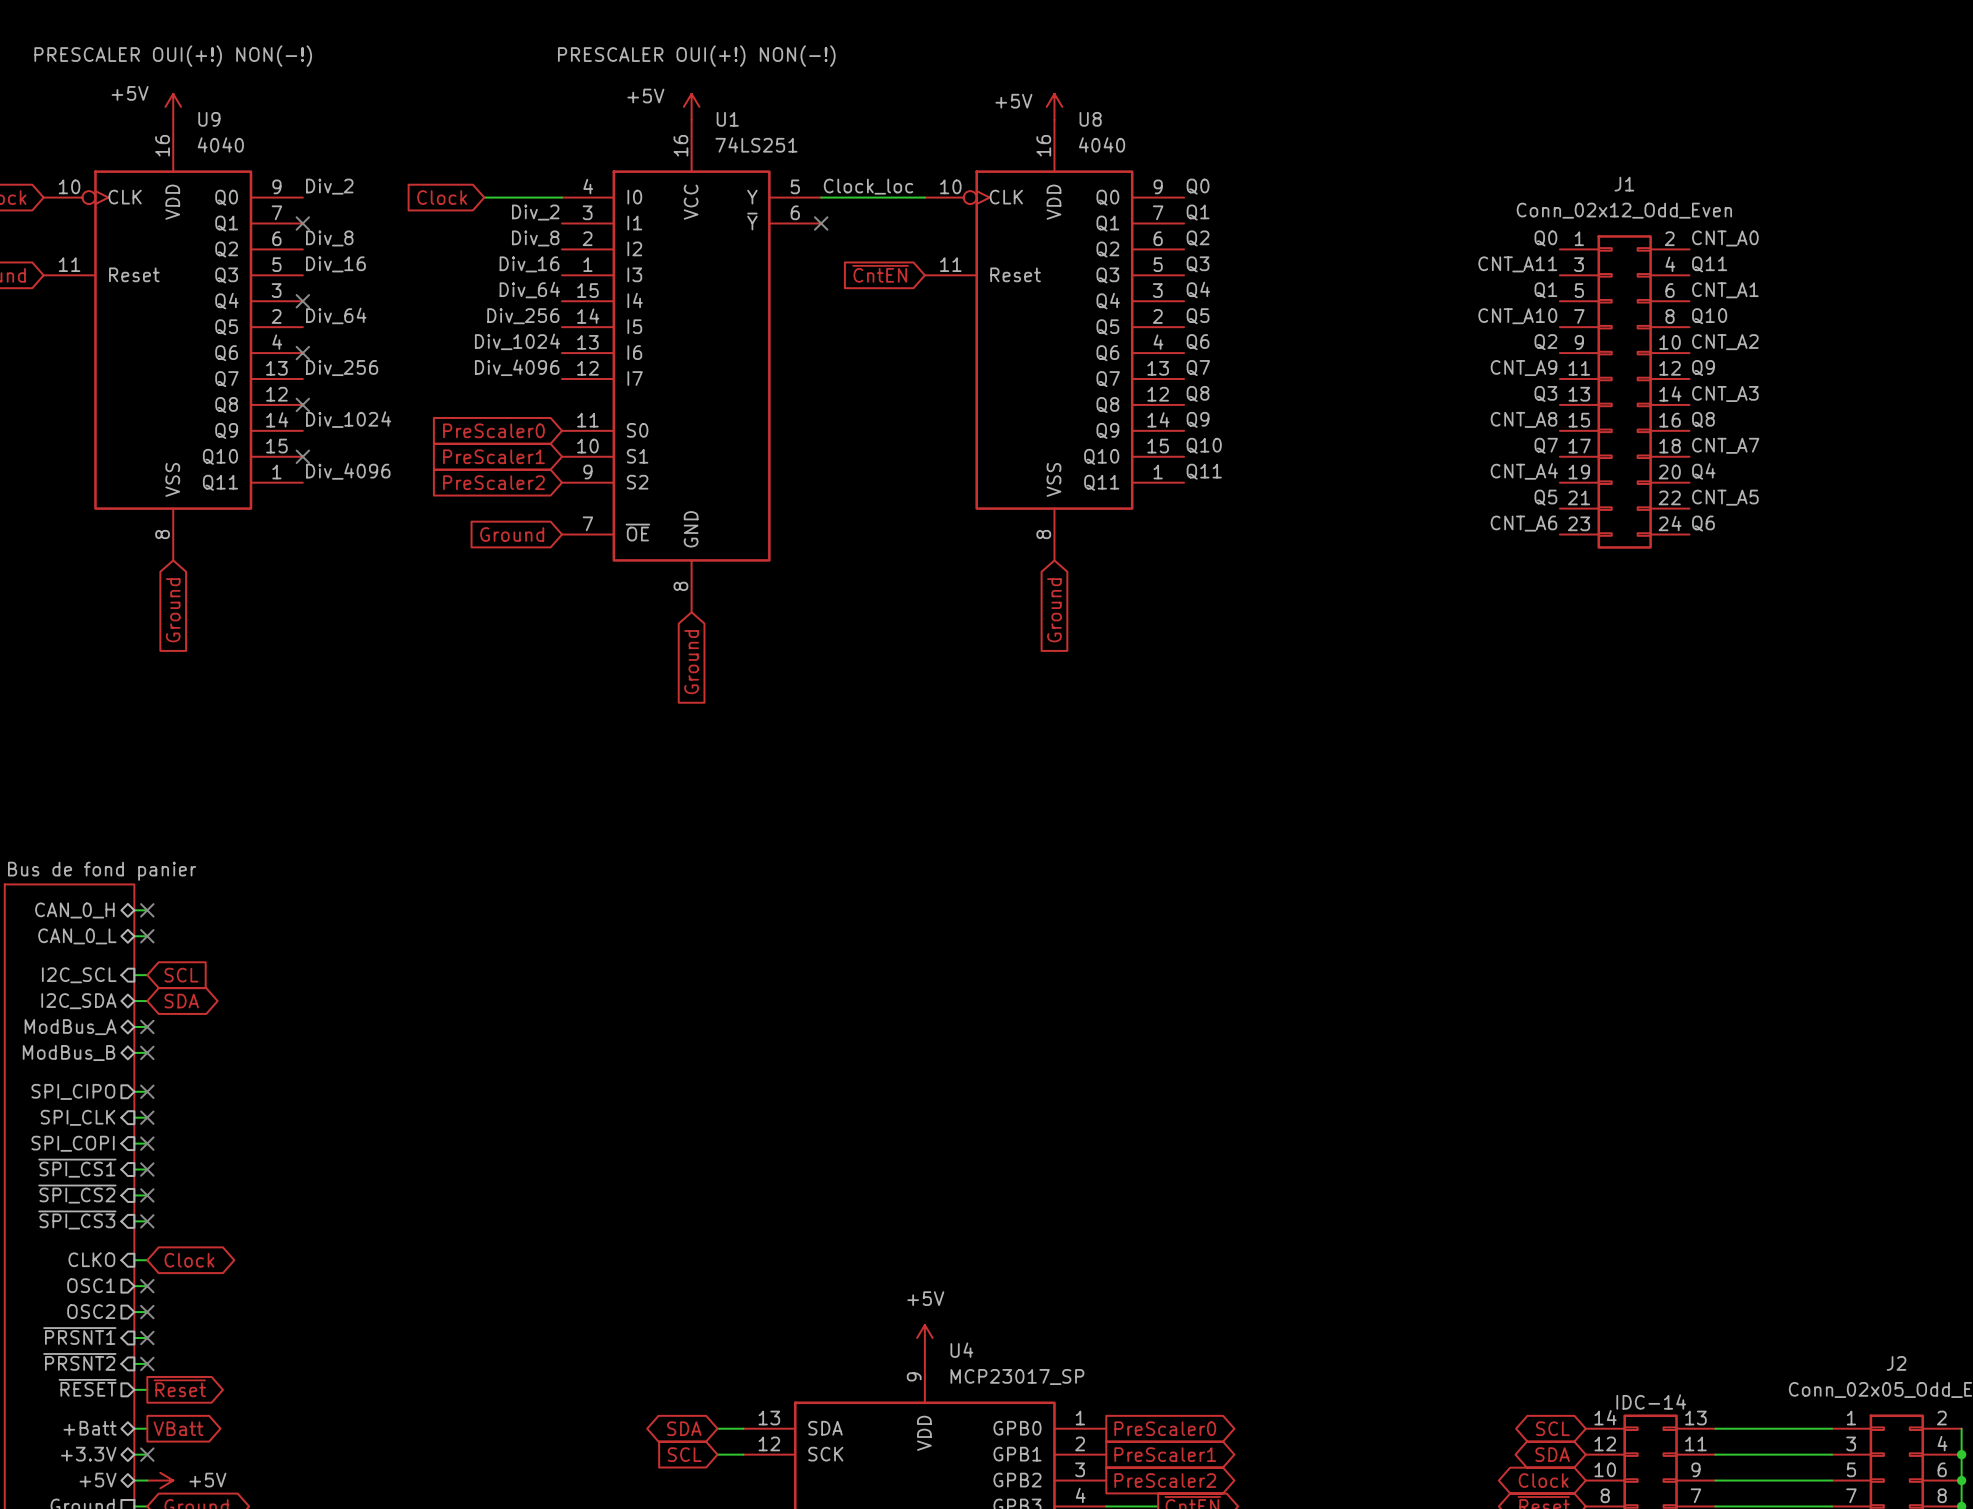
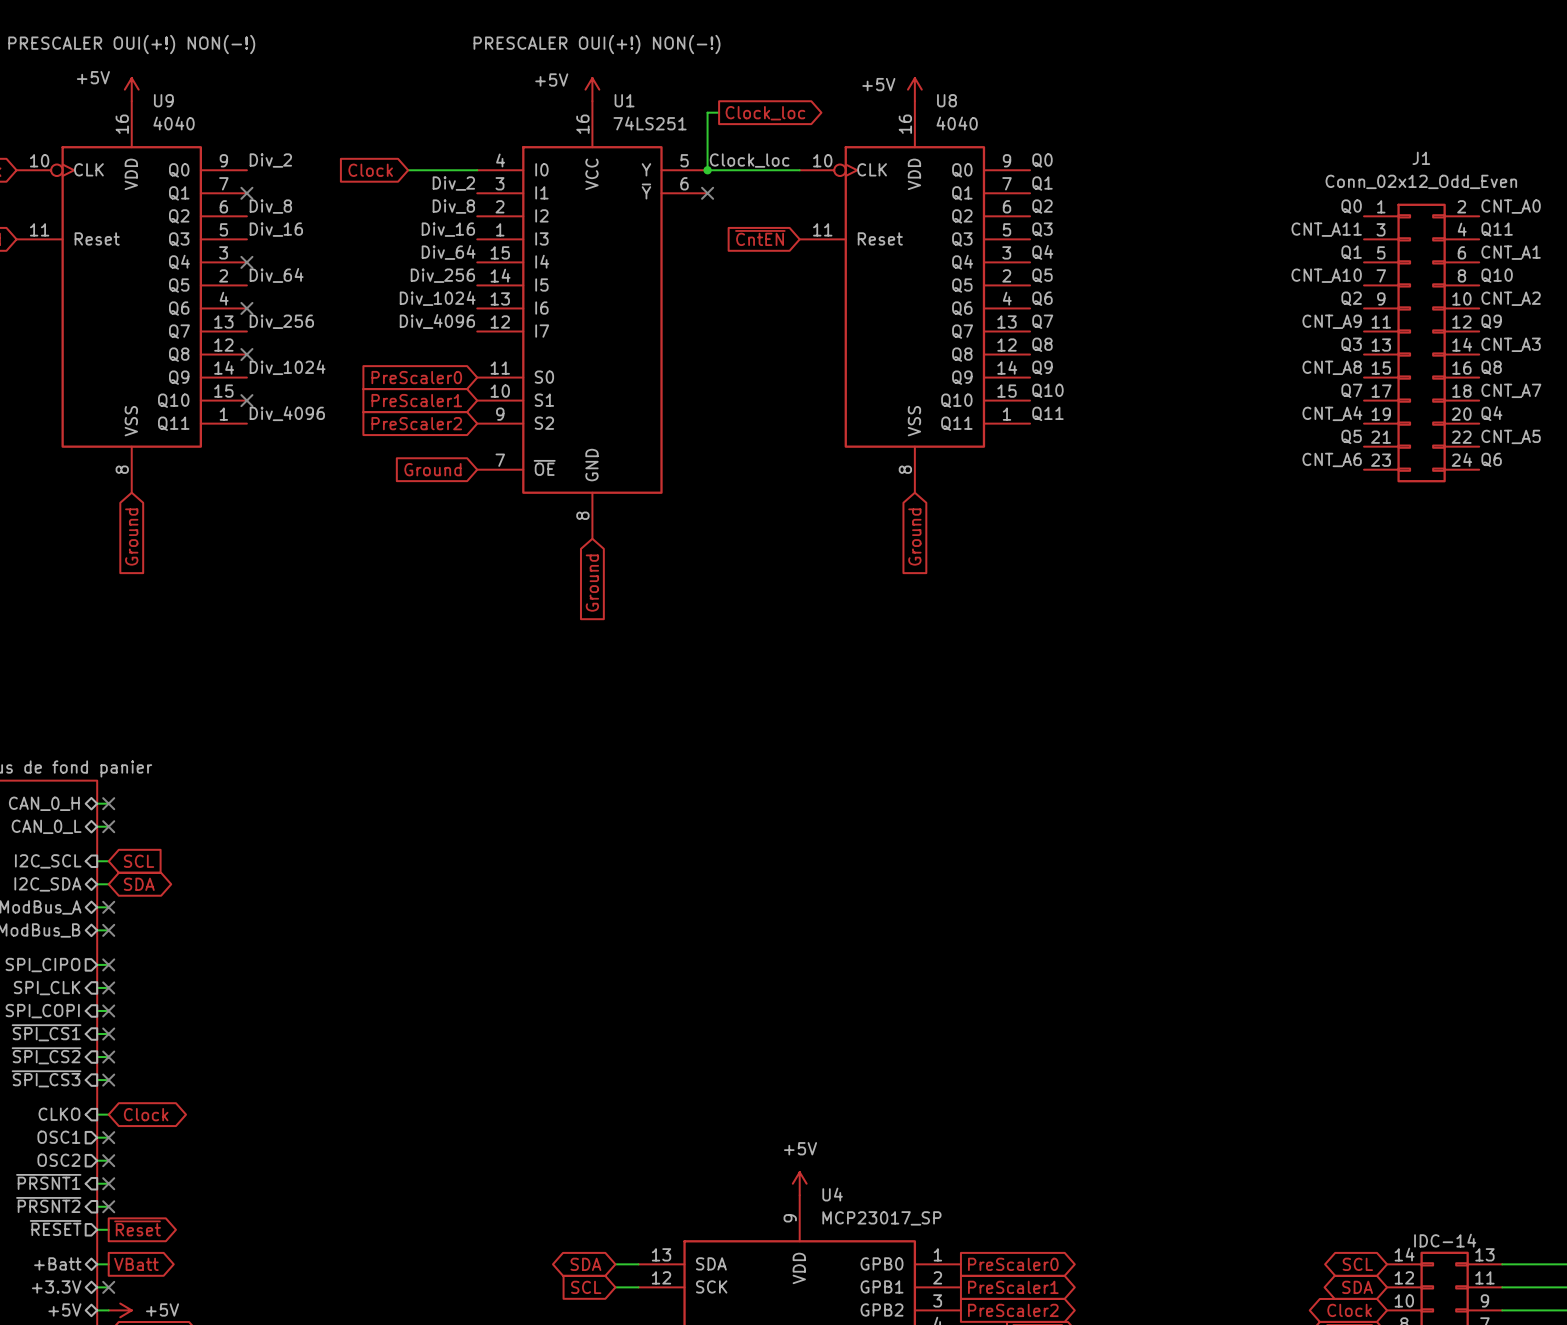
wire: none -> (719, 112) (707, 112) (707, 170)
global label: none -> Clock_loc (765, 113)
junction: none -> (707, 170)

